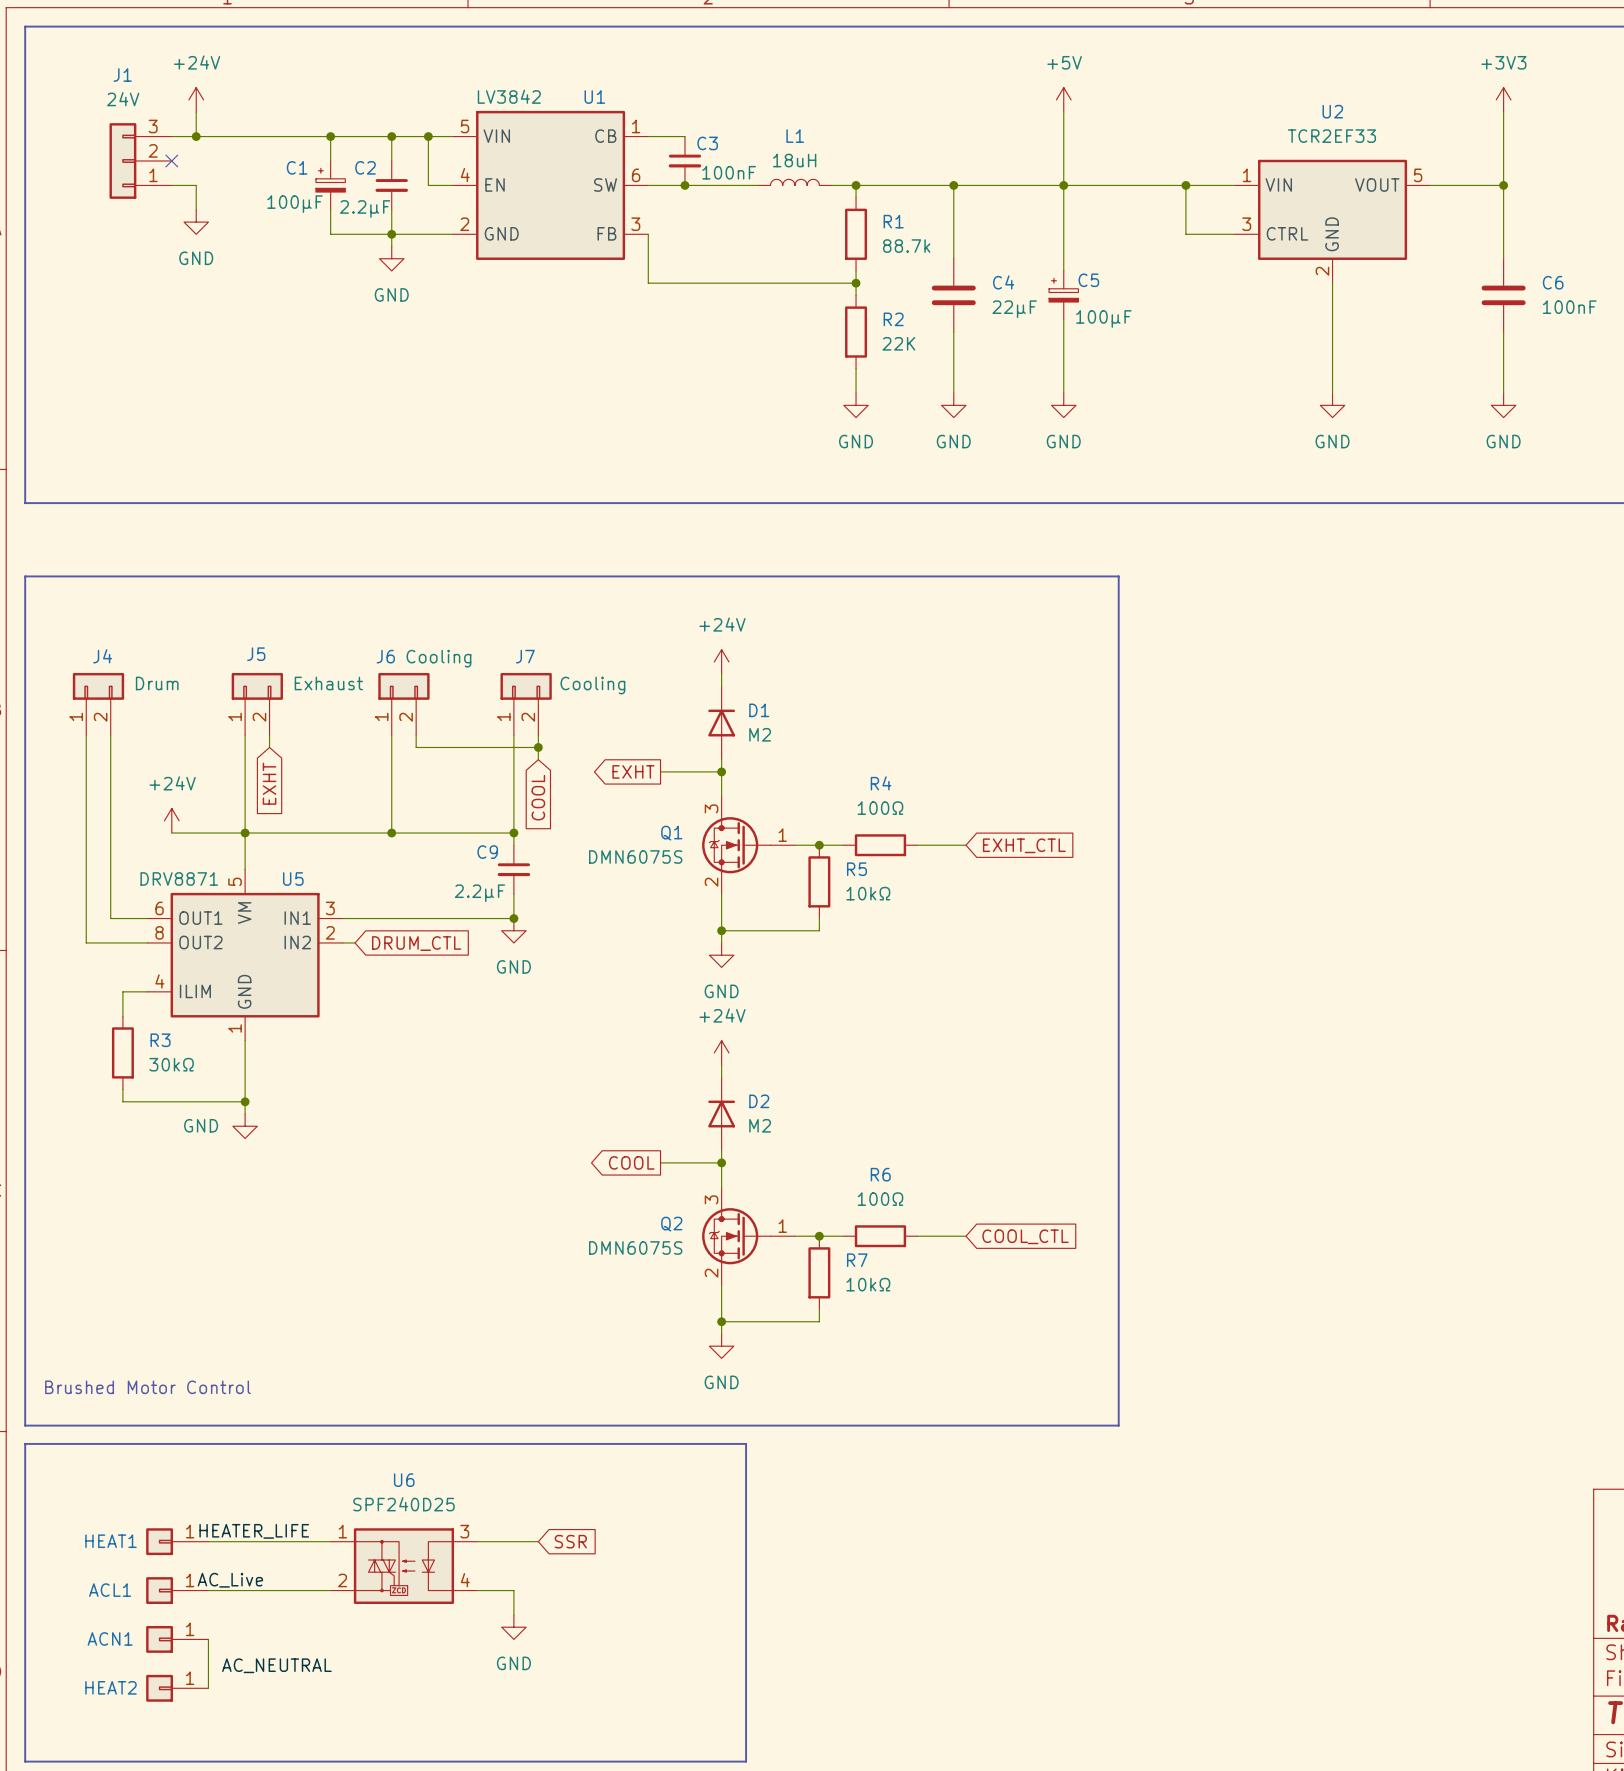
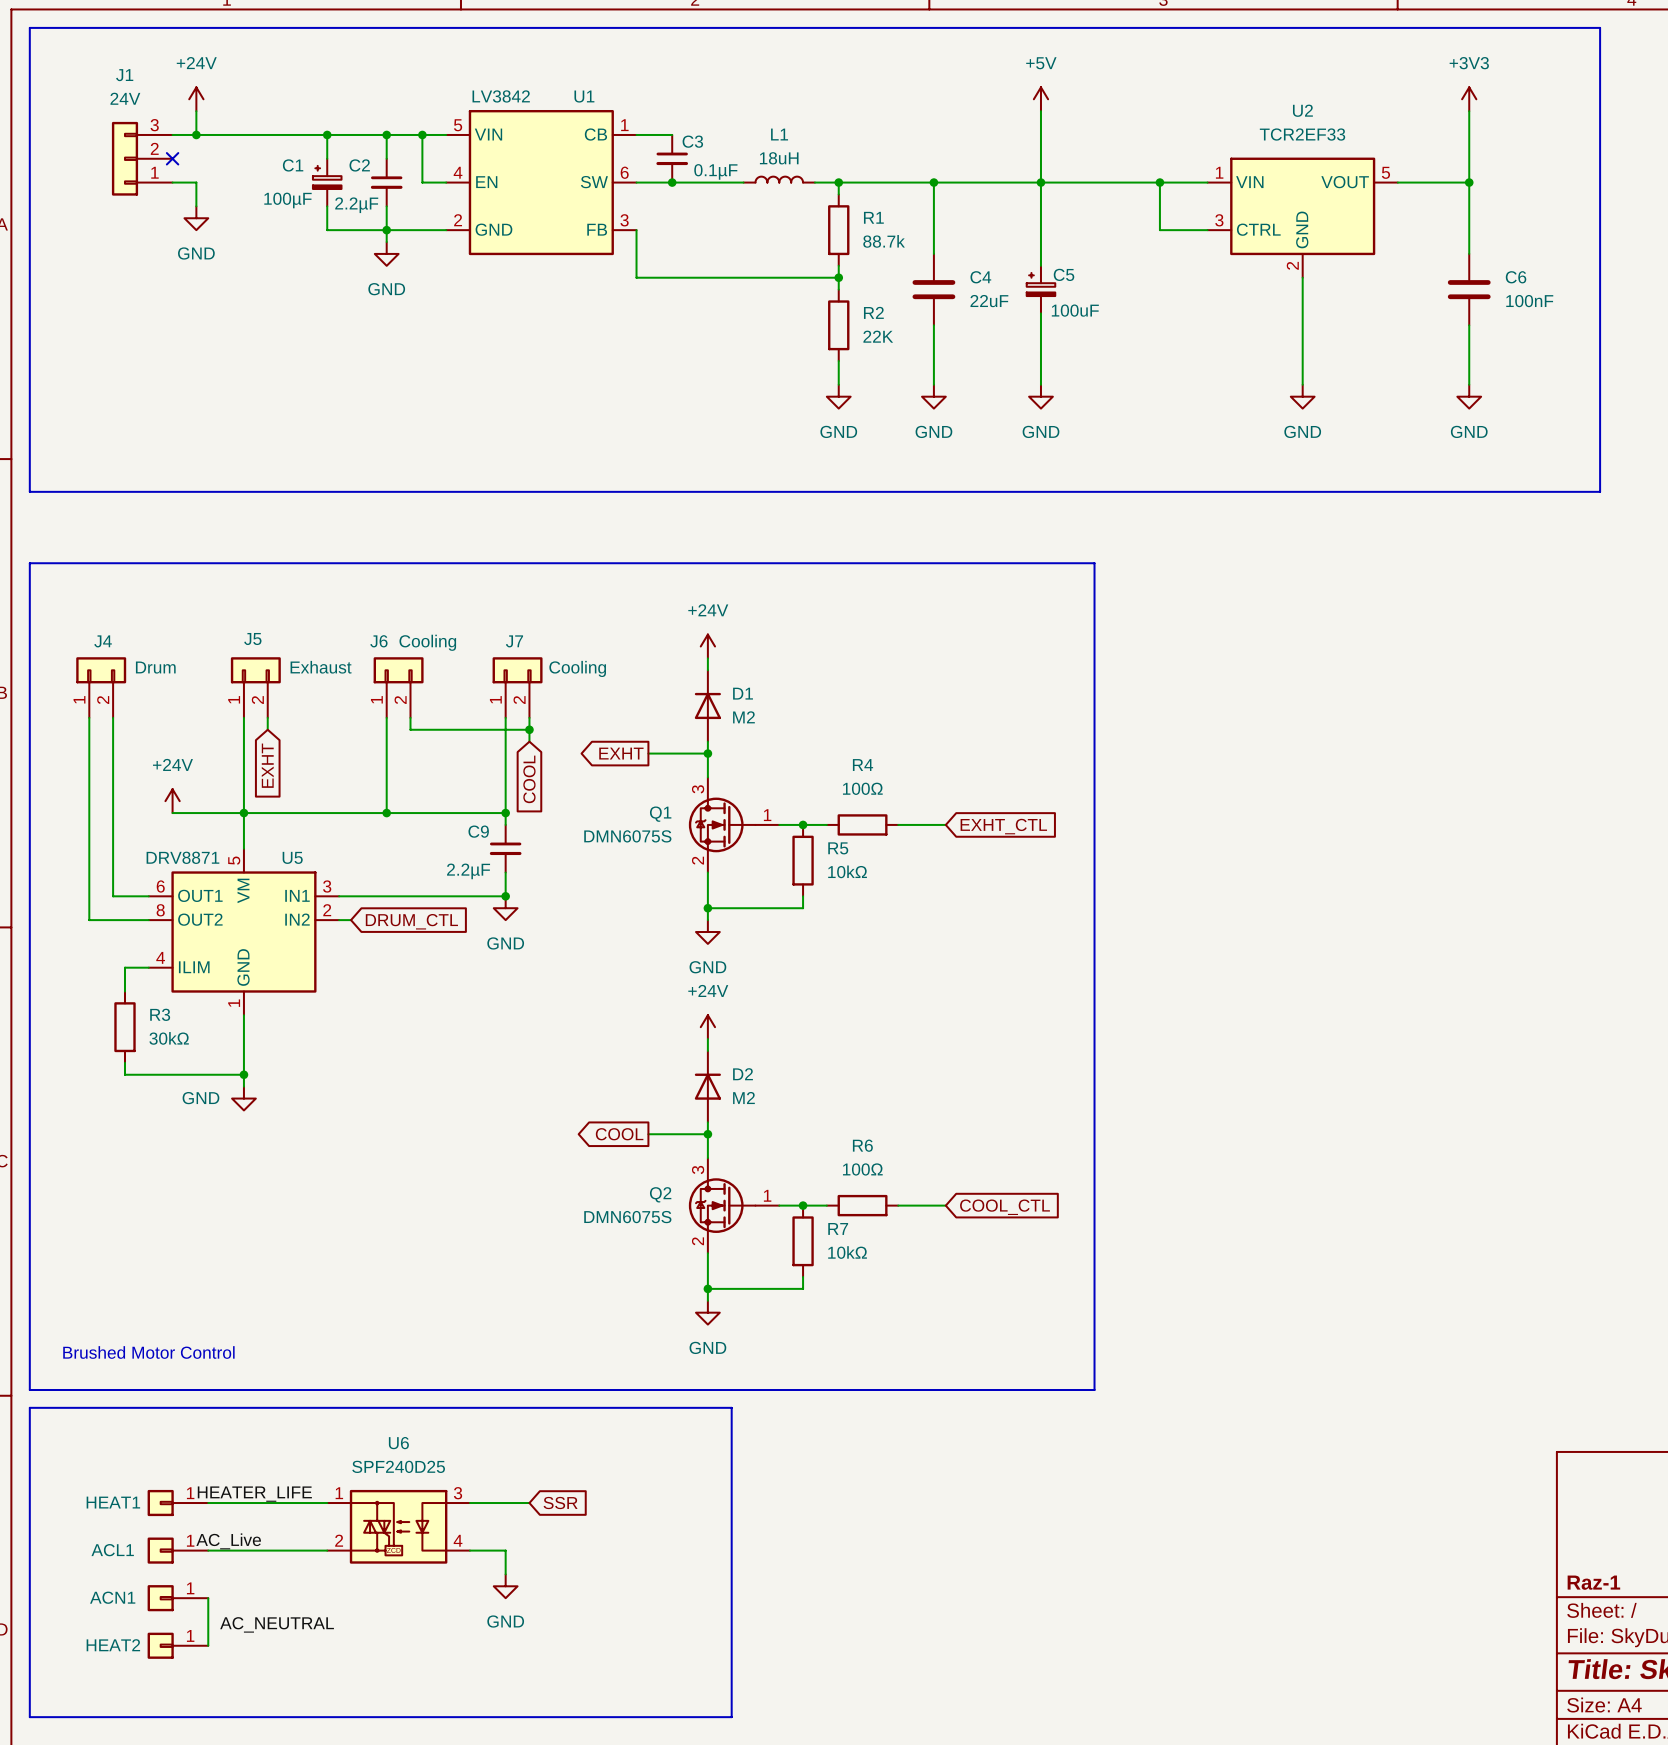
C3 value: 100nF (729, 172) -> 0.1µF (715, 171)
C4 value: 22µF (1014, 309) -> 22uF (989, 301)
C5 value: 100µF (1103, 318) -> 100uF (1075, 310)

